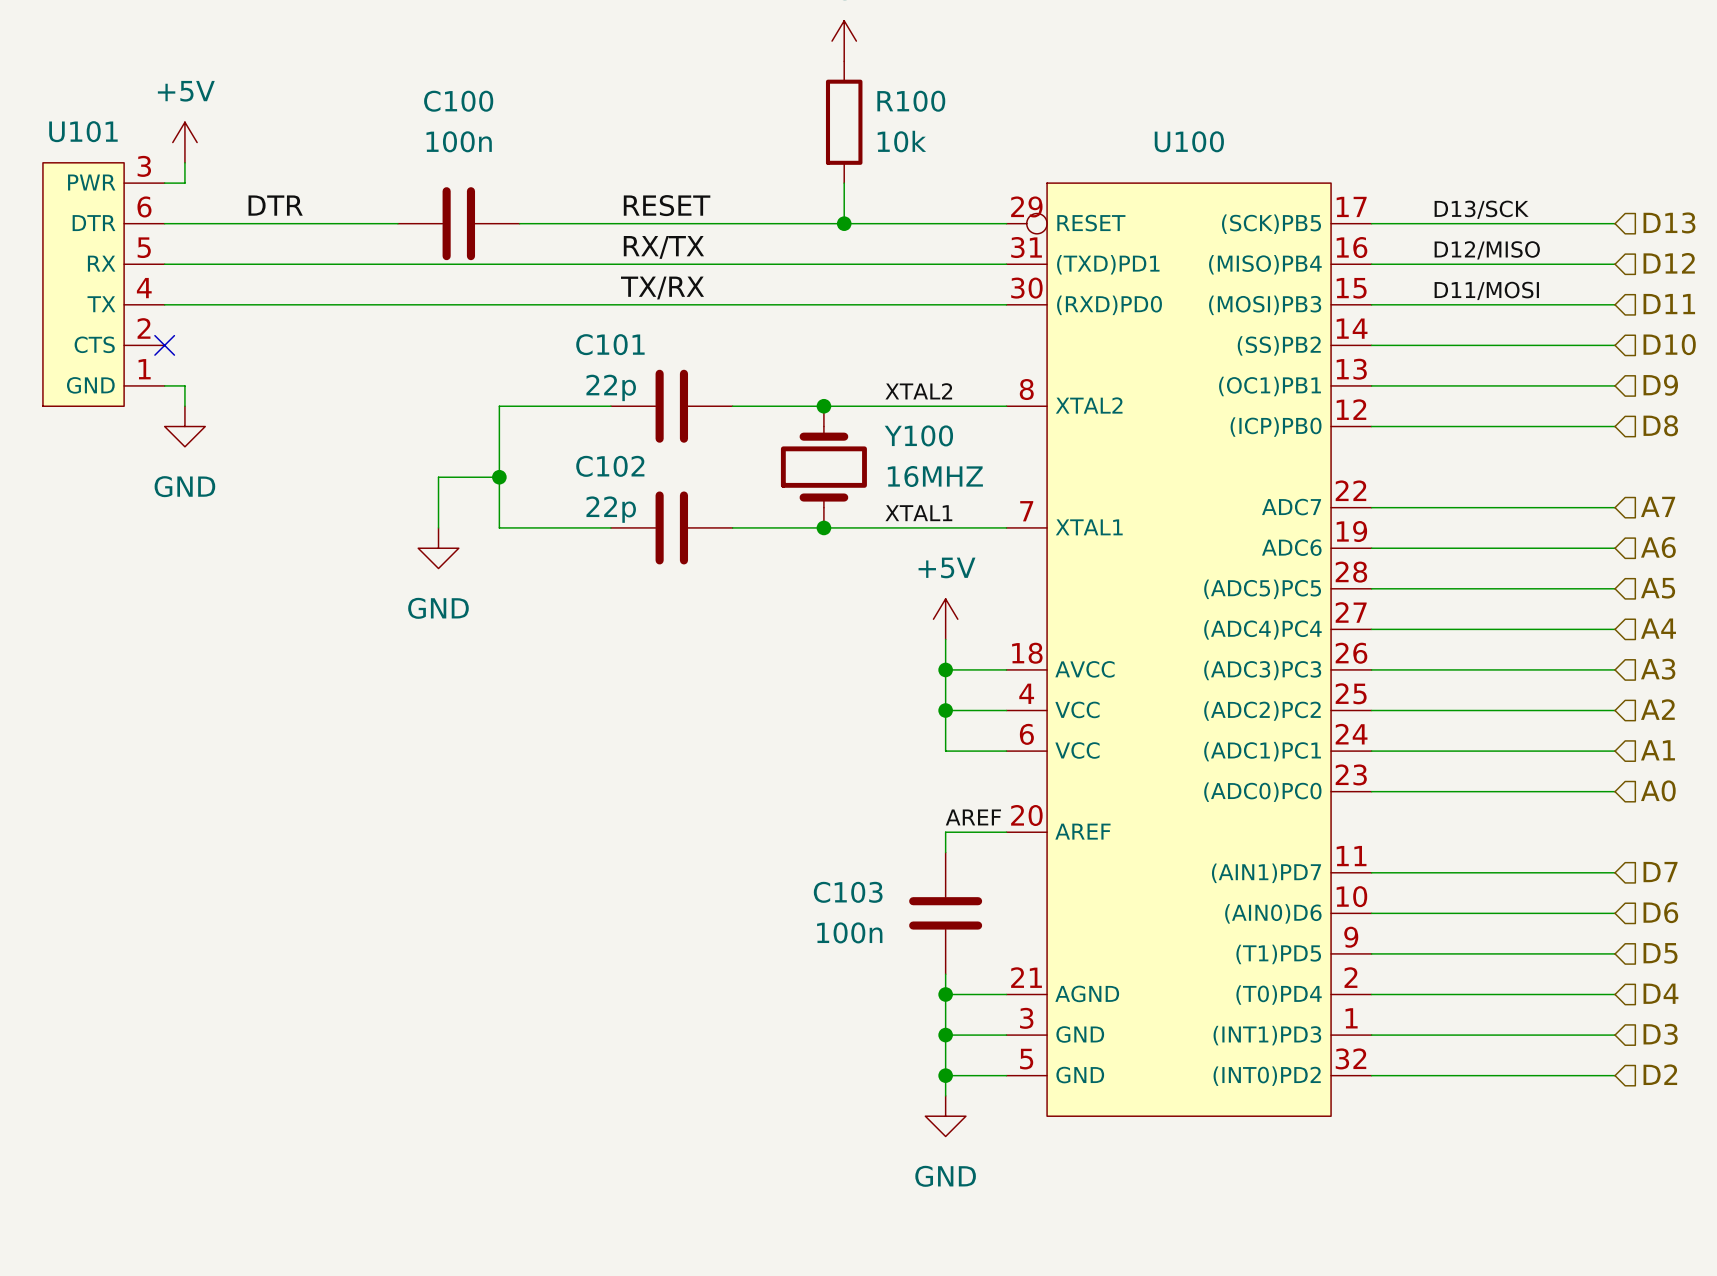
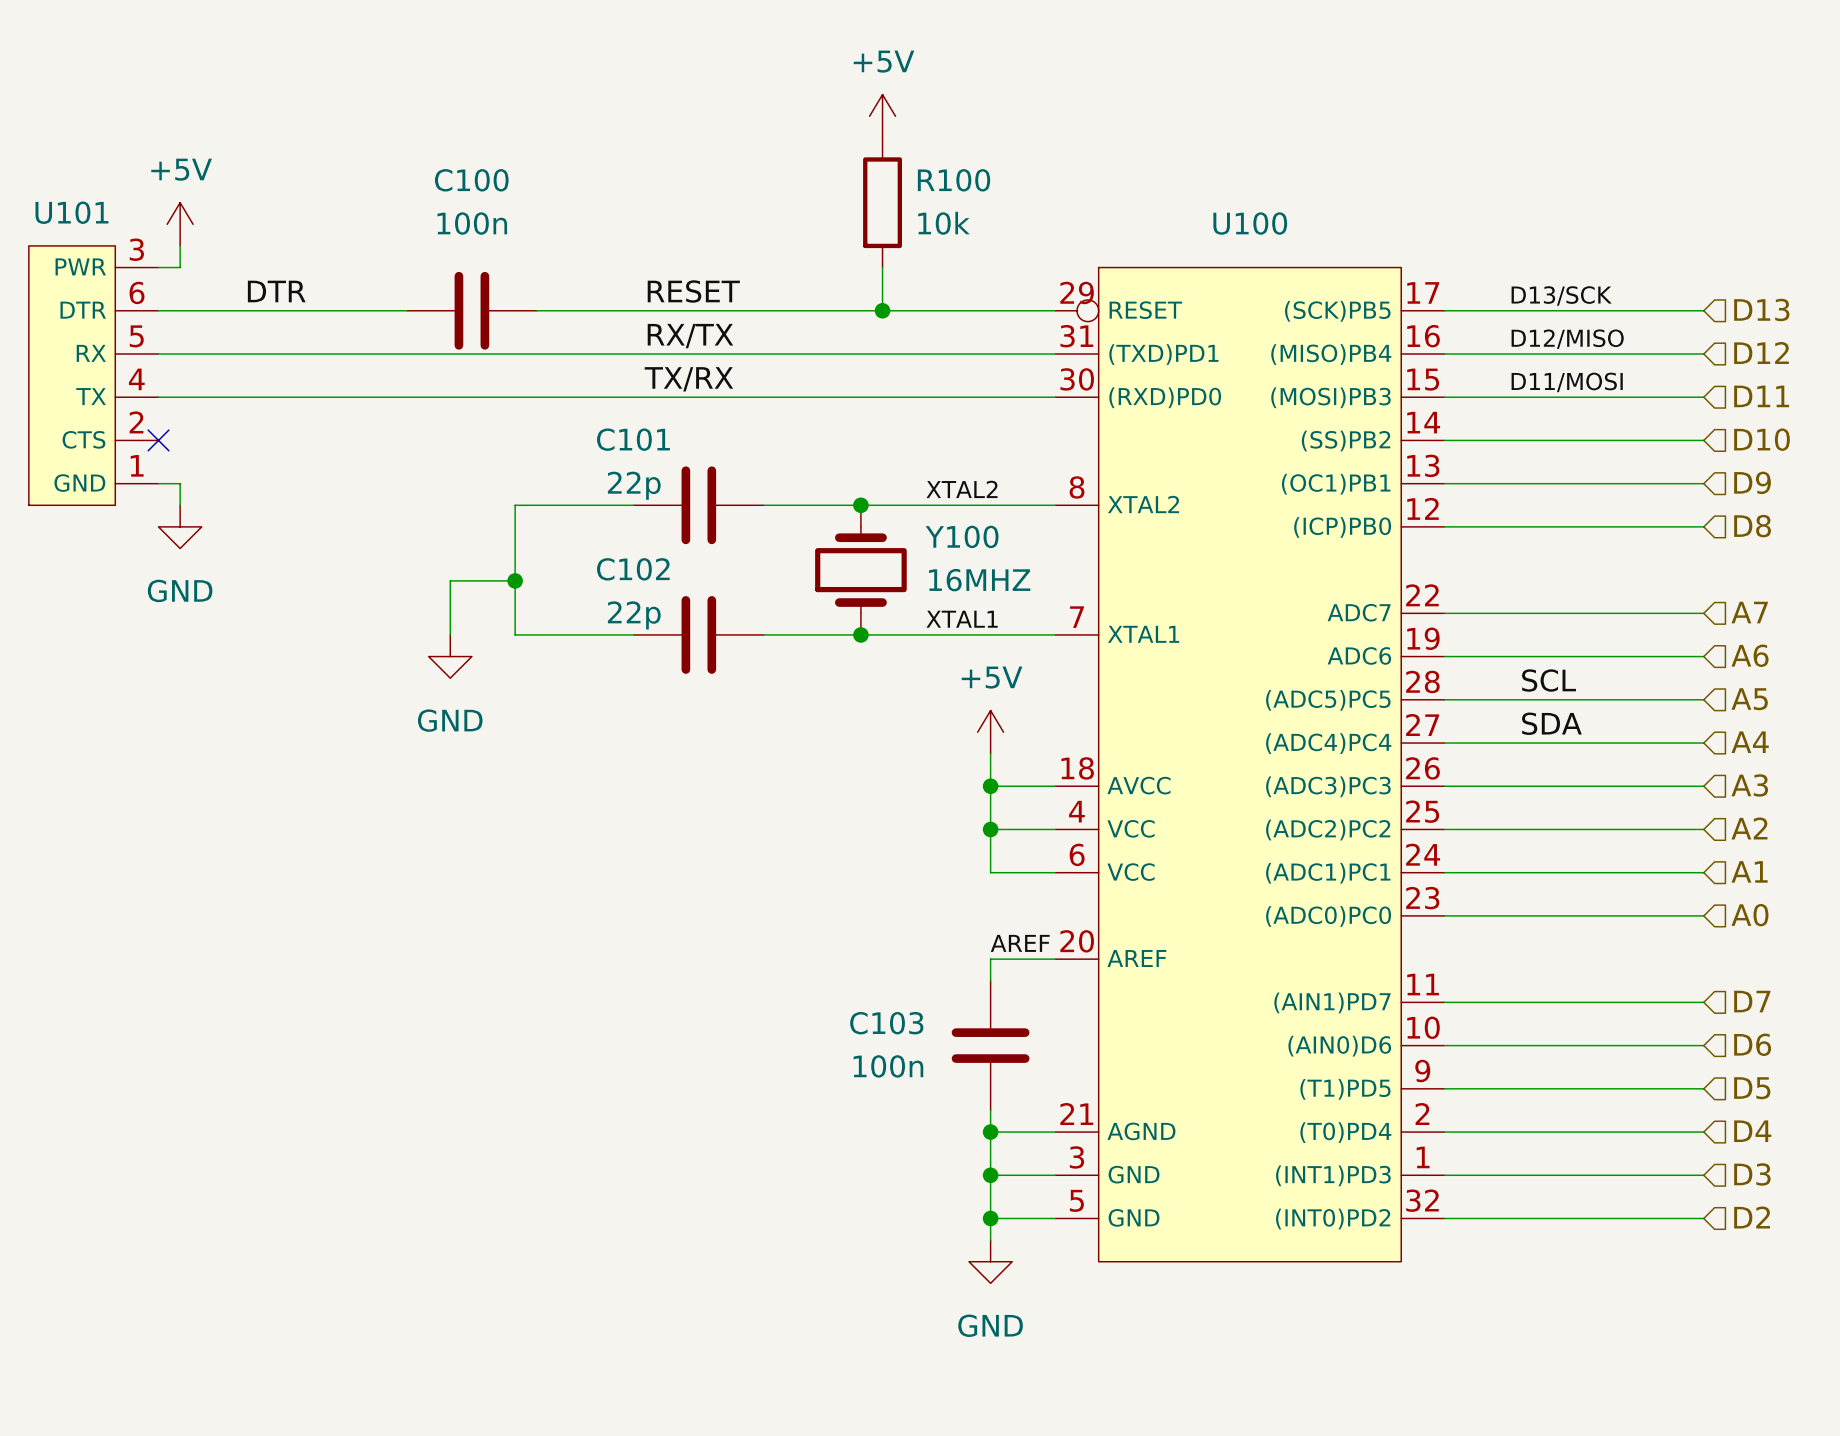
label: none -> SCL (1549, 680)
label: none -> SDA (1551, 723)

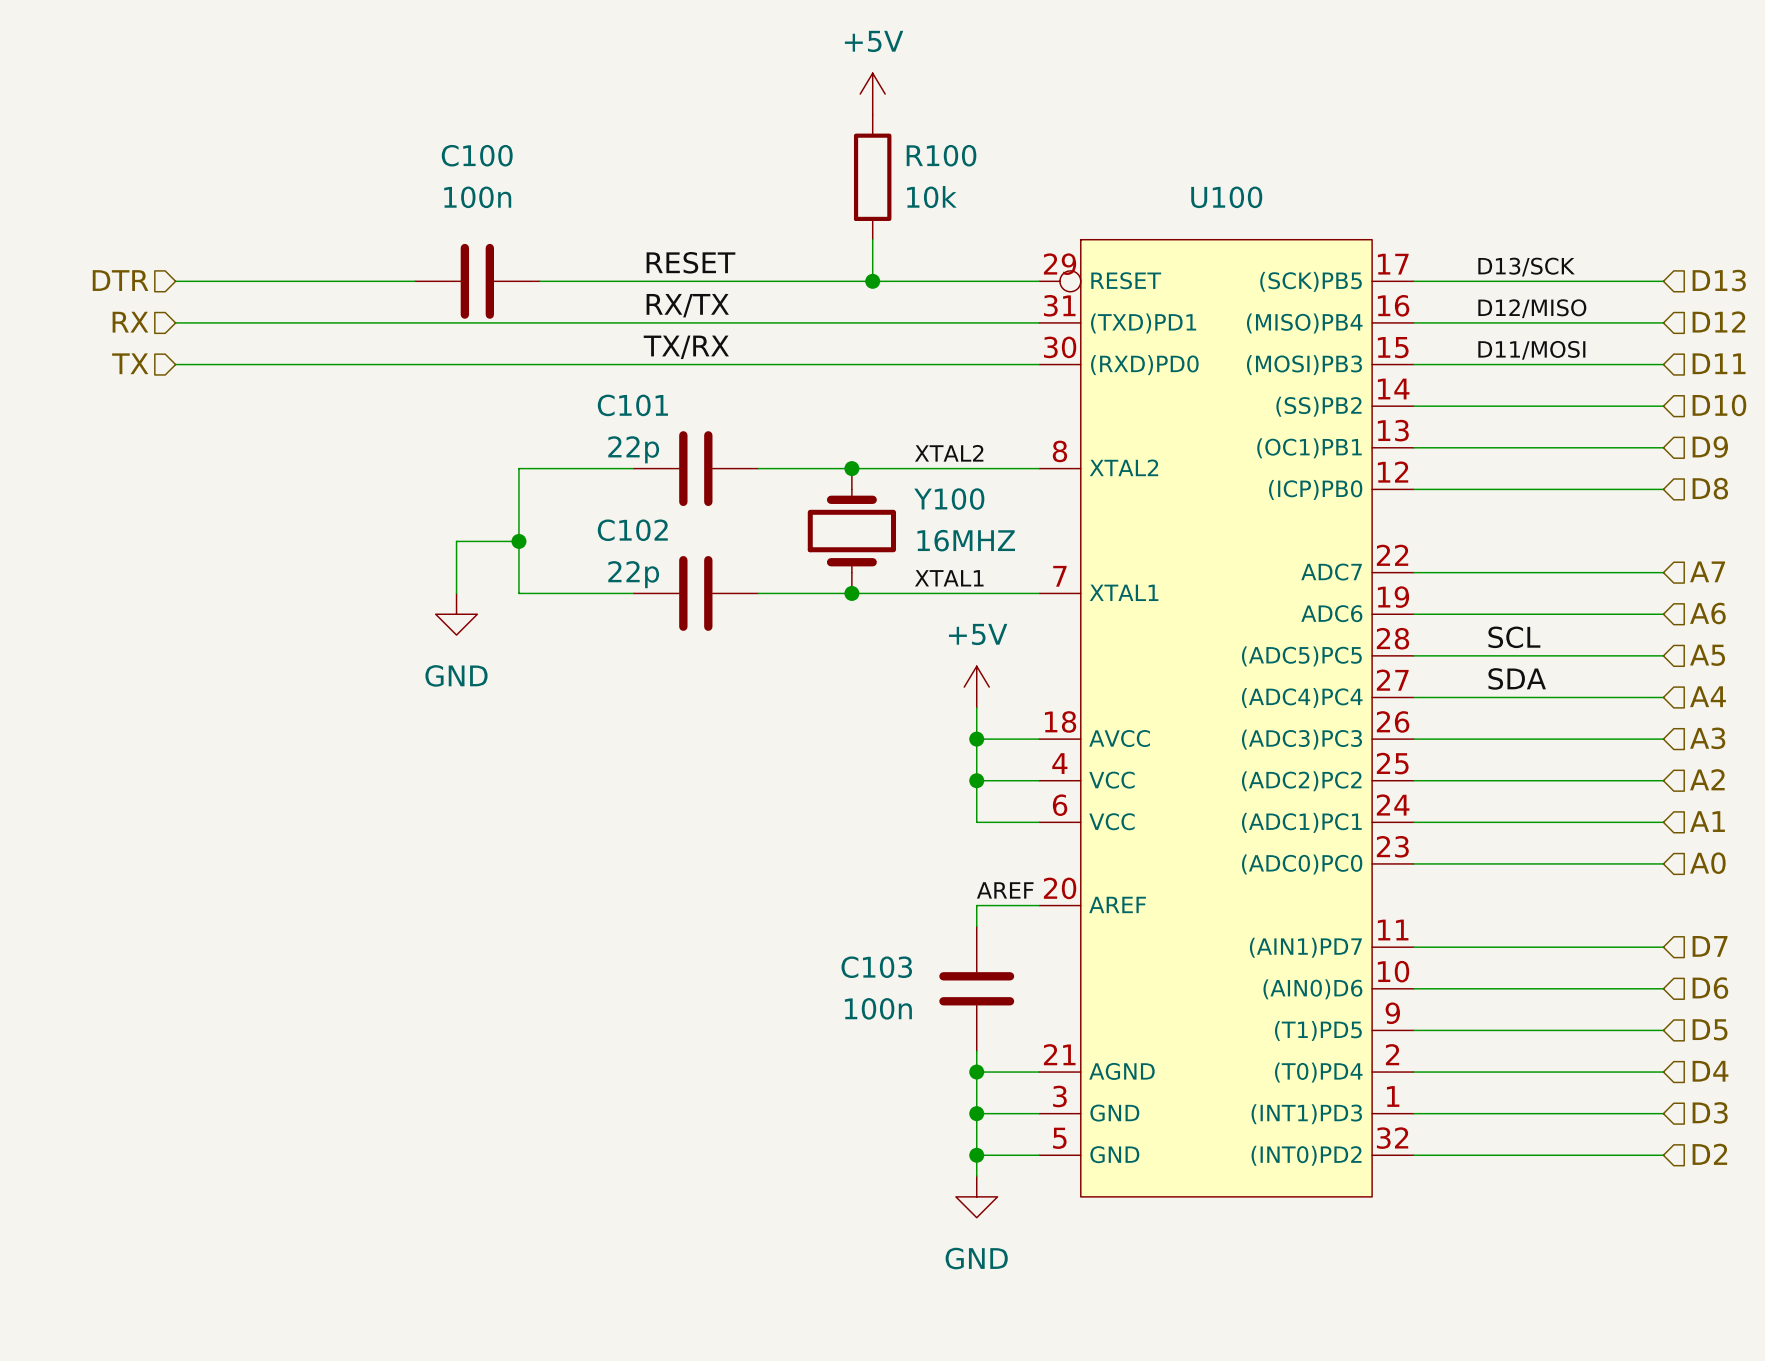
power symbol: +5V (180, 224) -> none
wire: (180, 245) (180, 267) (158, 267) -> none
label: DTR (276, 291) -> none
hierarchical label: none -> DTR (120, 280)
hierarchical label: none -> RX (130, 322)
U101: (93, 375) -> none
hierarchical label: none -> TX (130, 363)
no-connect mark: (158, 440) -> none
wire: (158, 483) (180, 483) (180, 505) -> none
power symbol: GND (180, 526) -> none

